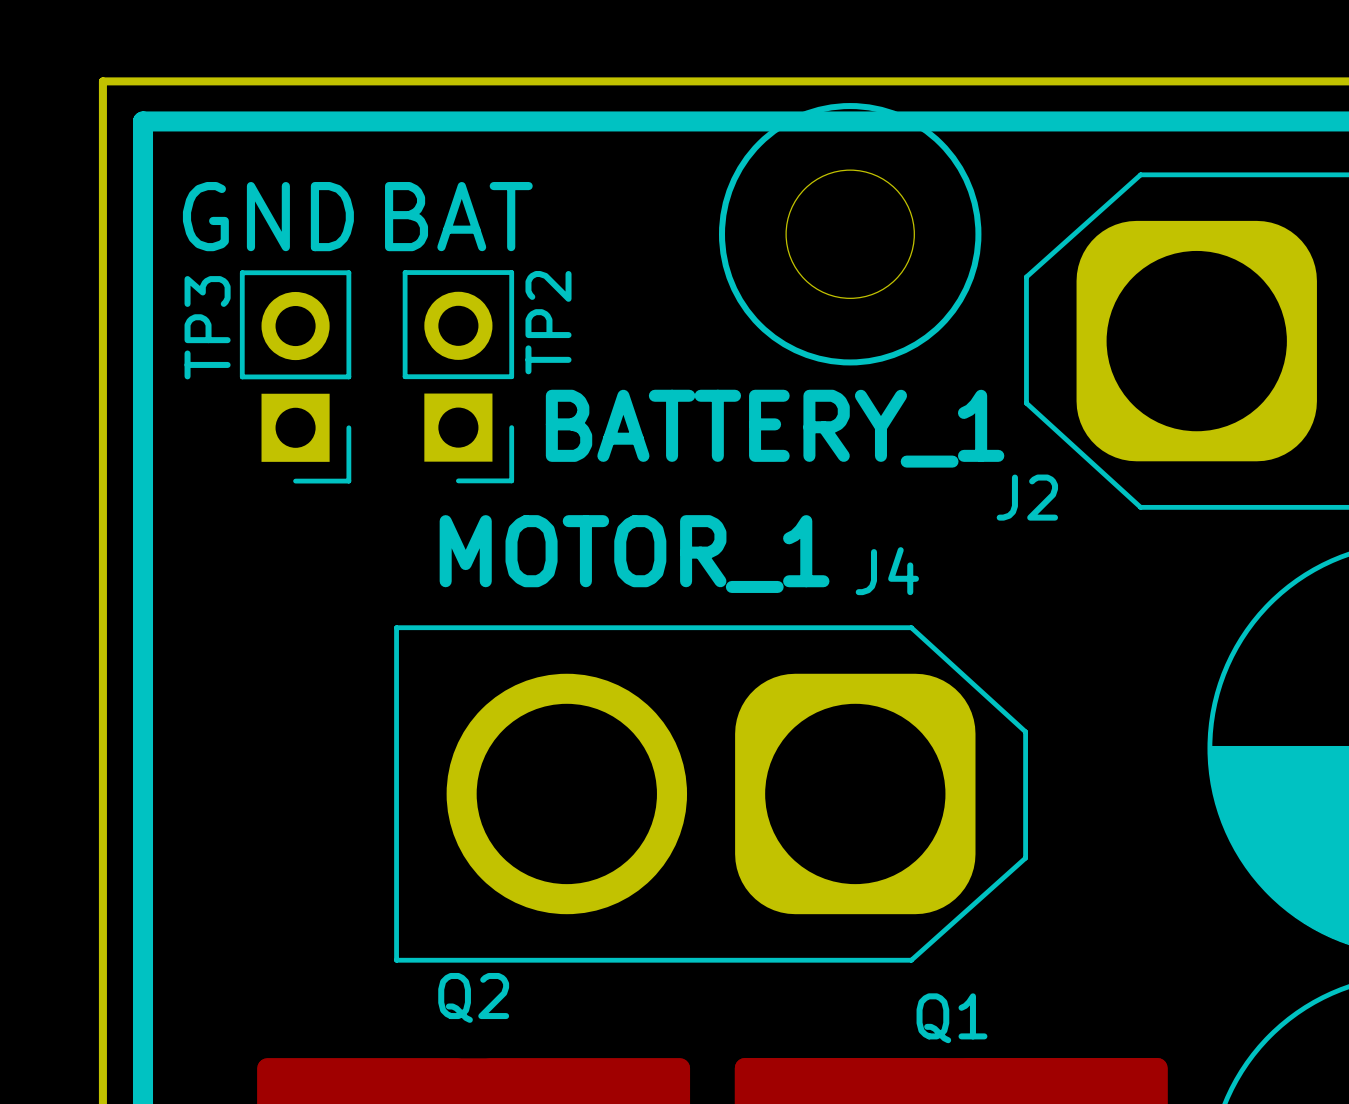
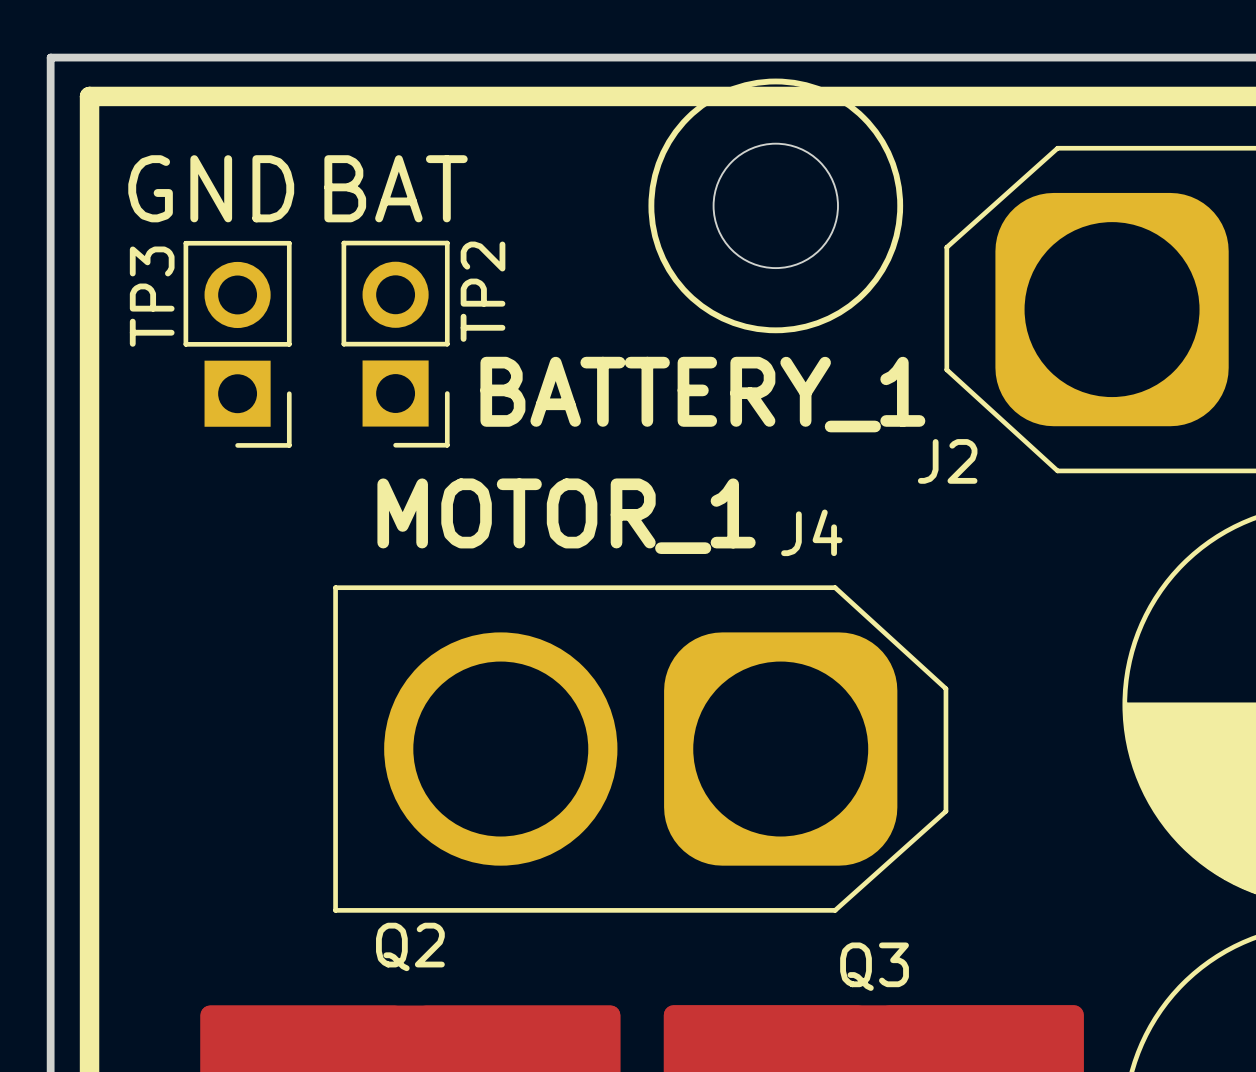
Q1 name: Q1 (951, 1018) -> Q3 (874, 966)

